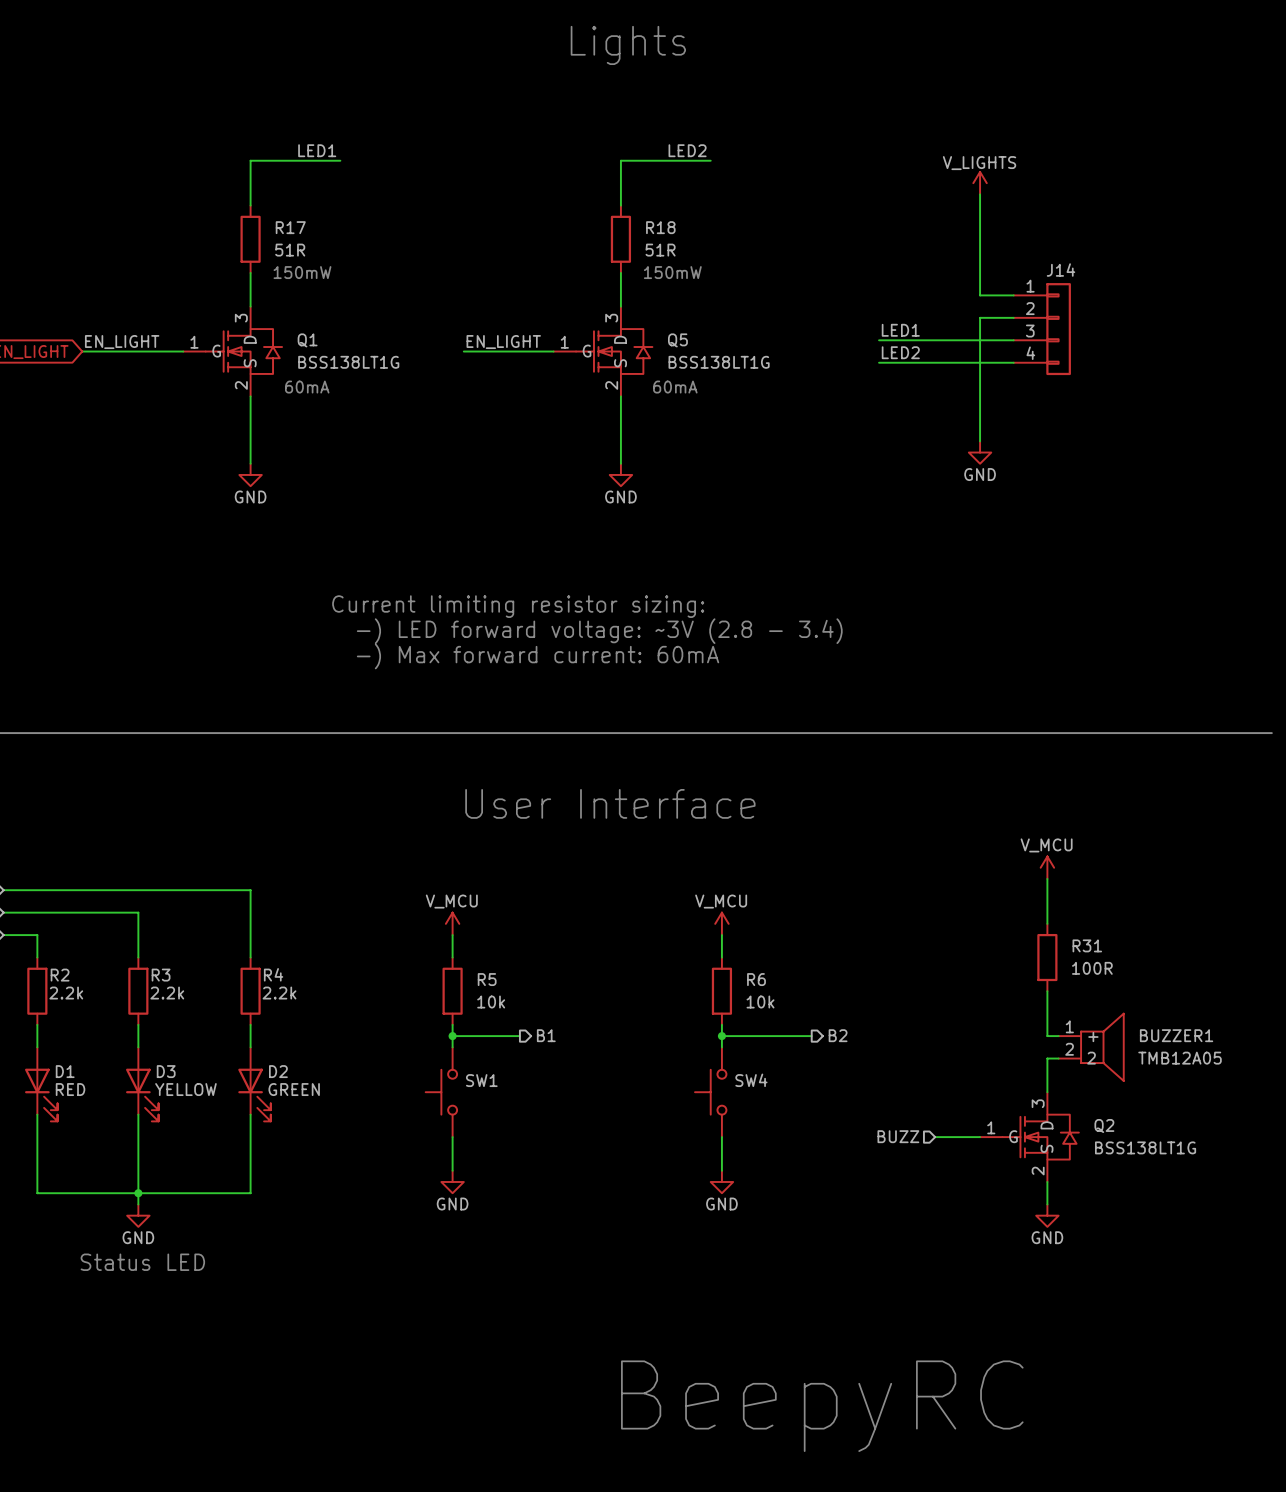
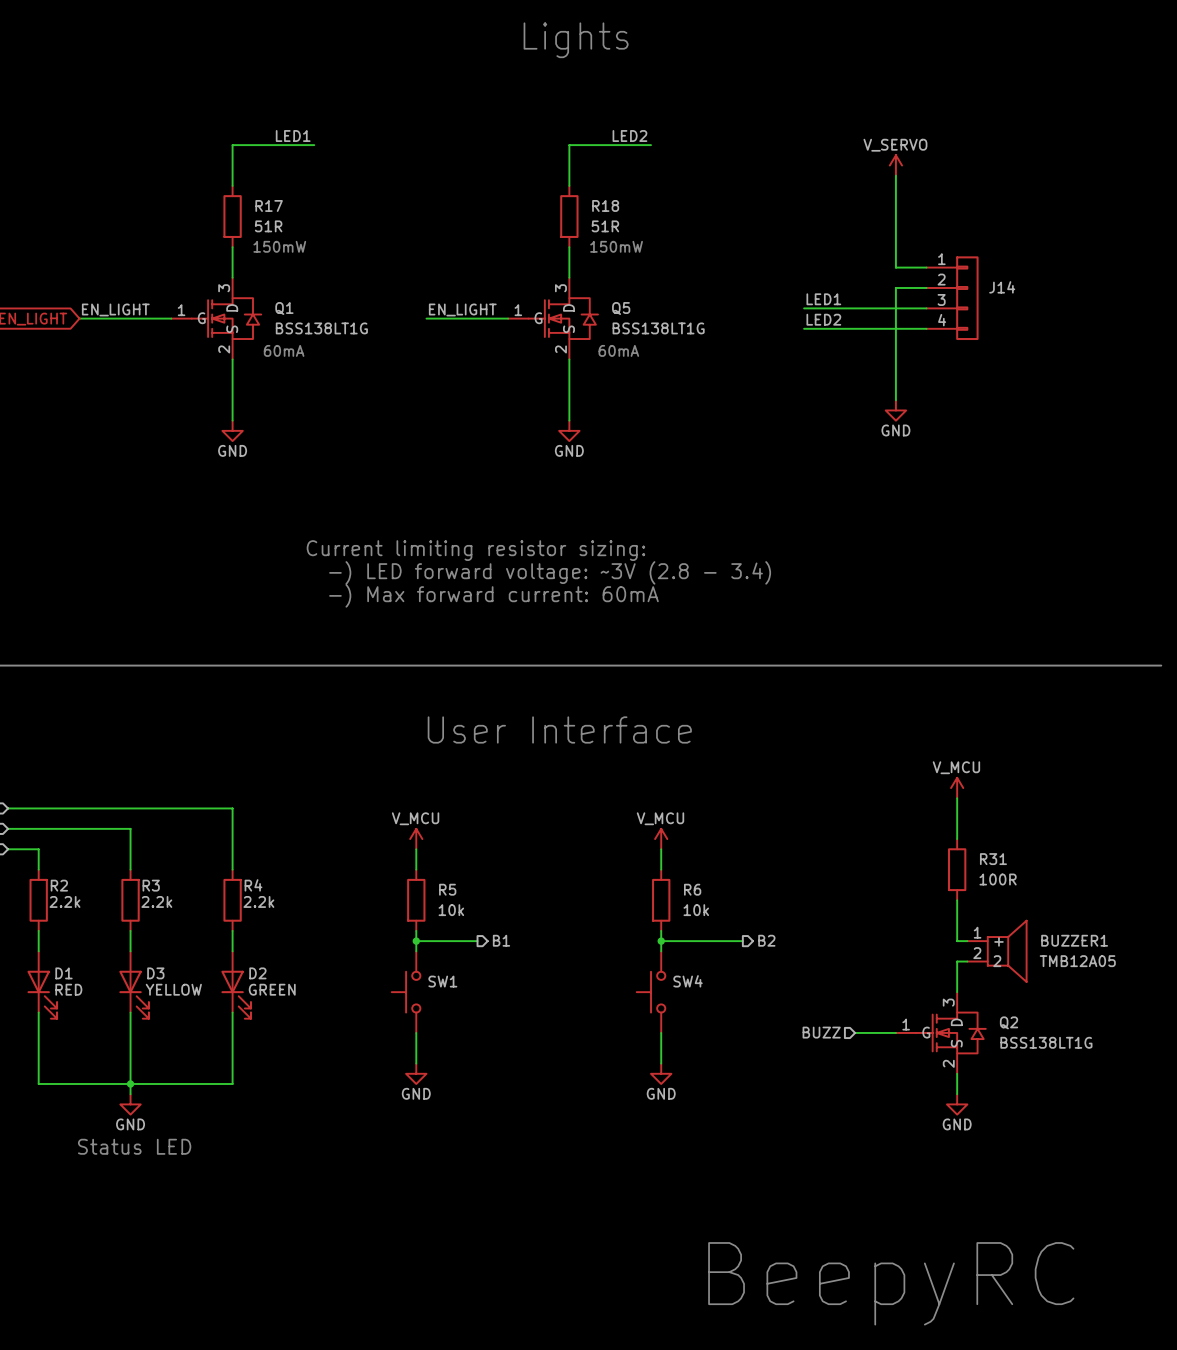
power symbol: V_LIGHTS (980, 183) -> V_SERVO (895, 165)
J14 name position: J14 (1061, 270) -> J14 (1002, 287)
text position: BeepyRC (822, 1406) -> BeepyRC (891, 1283)

